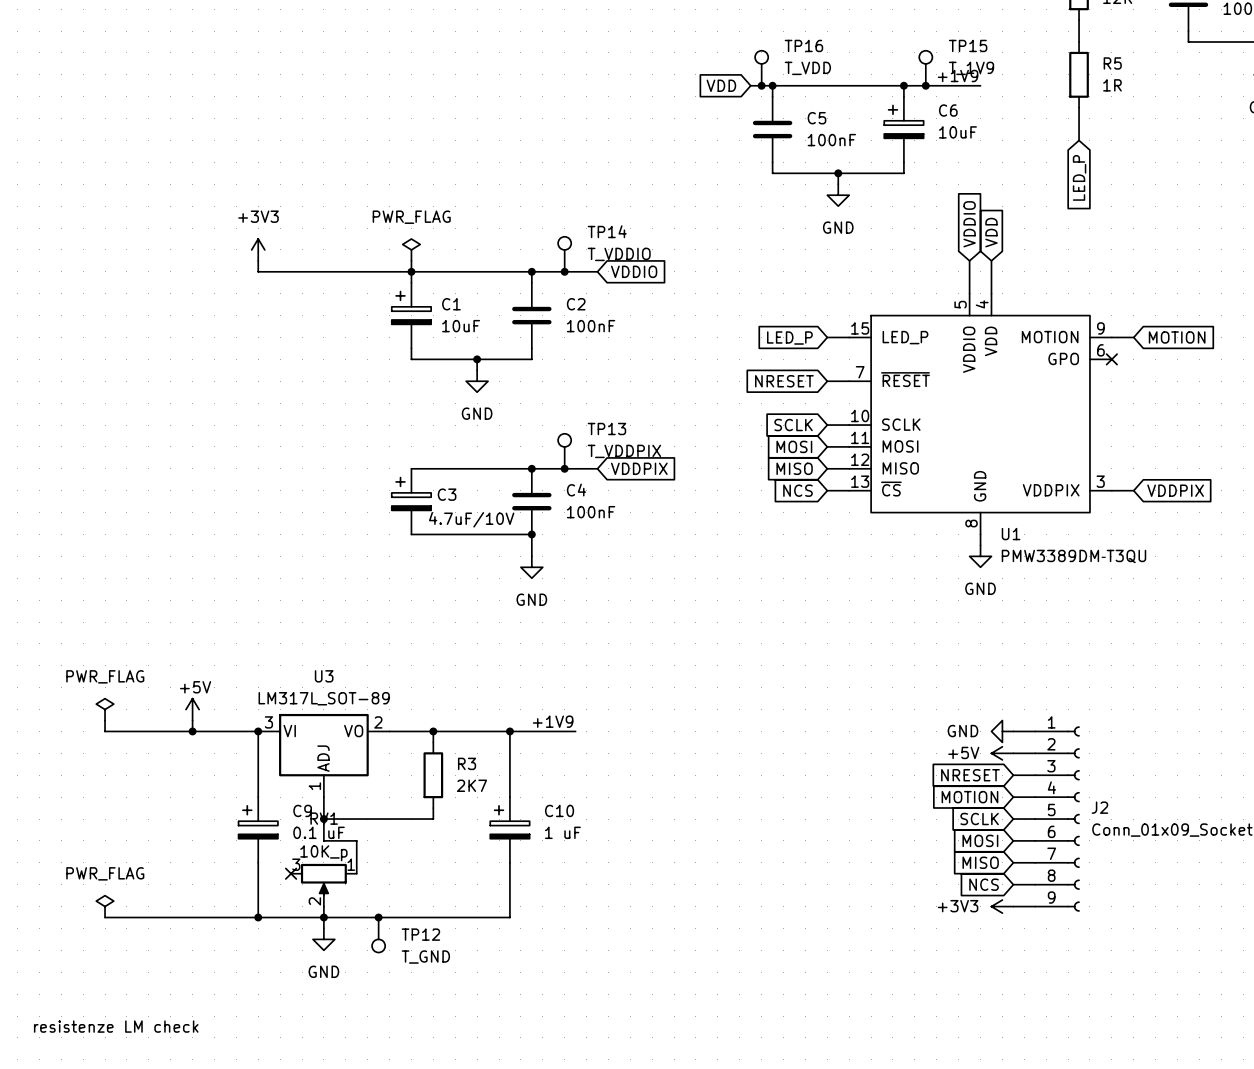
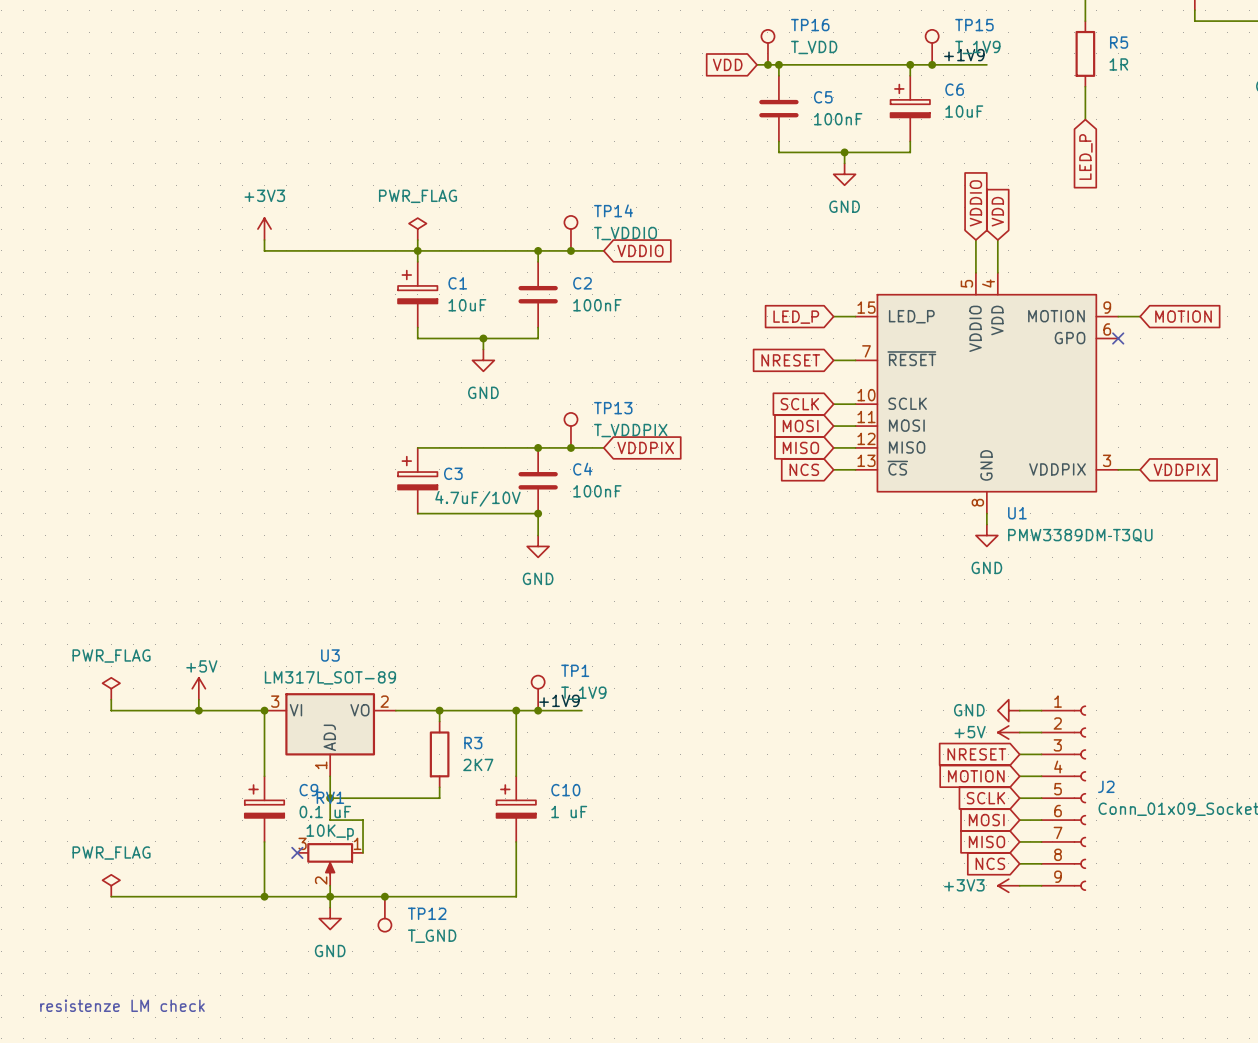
TP1: none -> T_1V9 (538, 693)
junction: none -> (538, 710)

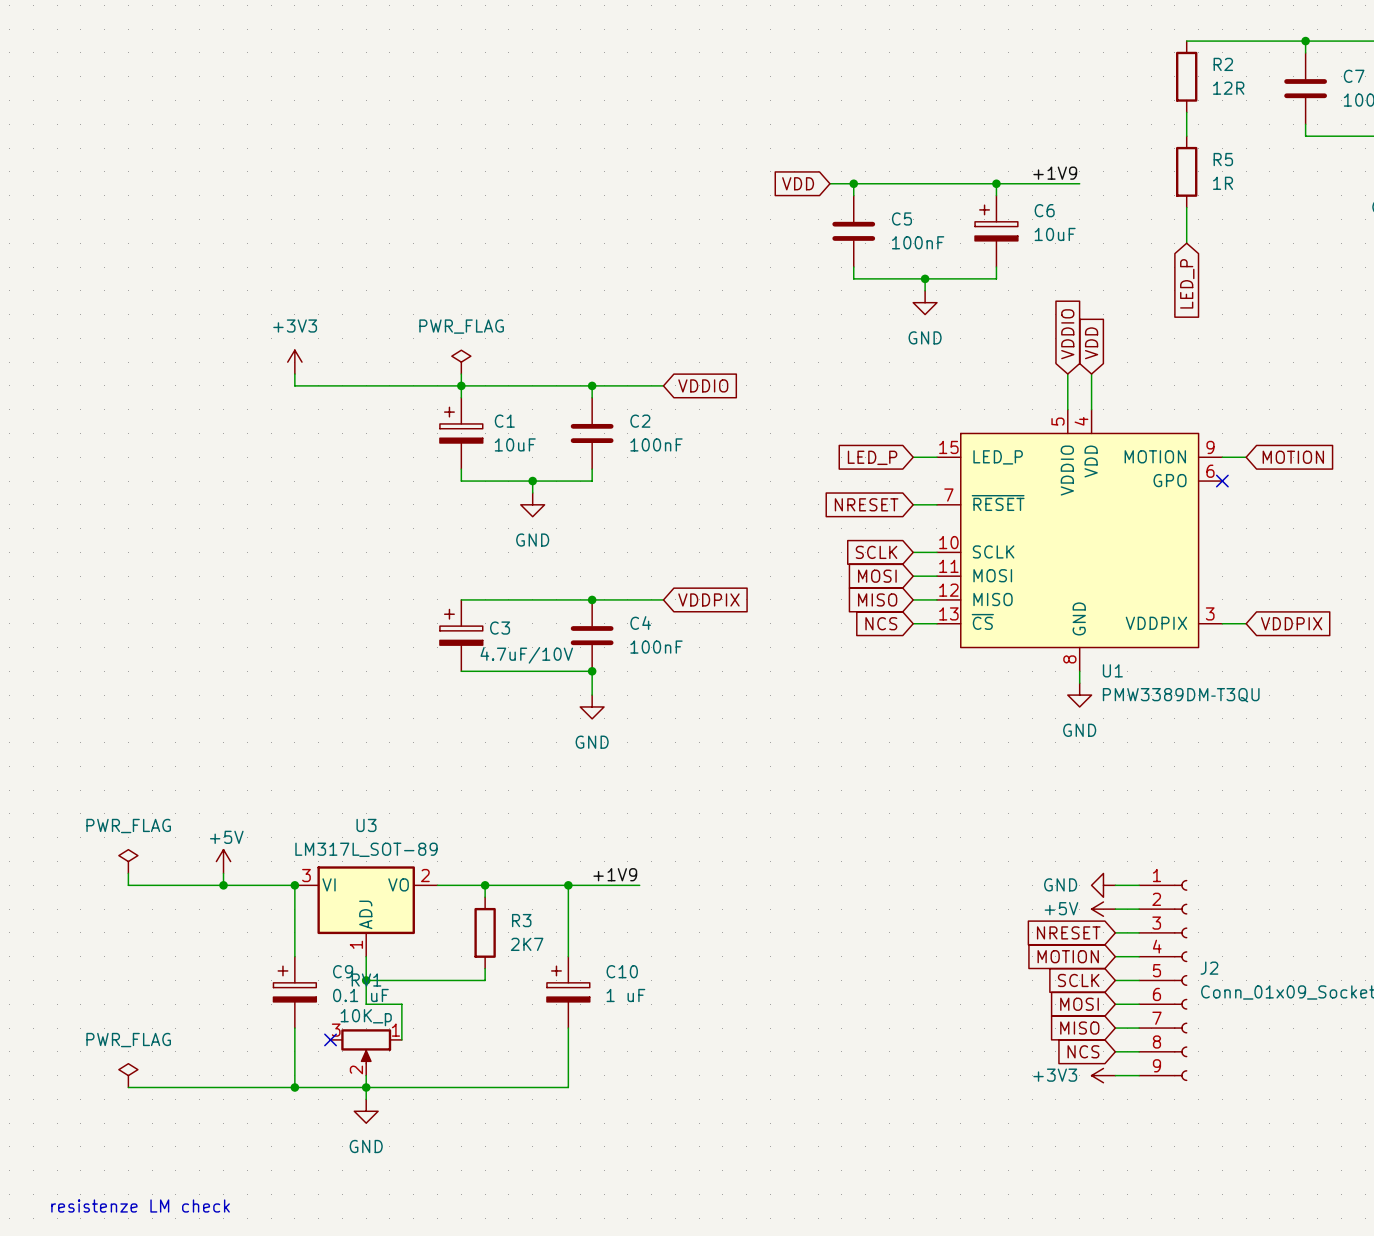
TP16: T_VDD (767, 47) -> none
TP15: T_1V9 (932, 47) -> none
junction: (767, 64) -> none
junction: (932, 64) -> none
TP14: T_VDDIO (570, 233) -> none
junction: (570, 250) -> none
TP13: T_VDDPIX (570, 430) -> none
junction: (570, 447) -> none
TP1: T_1V9 (538, 693) -> none
junction: (538, 710) -> none
junction: (384, 896) -> none
TP12: T_GND (384, 914) -> none

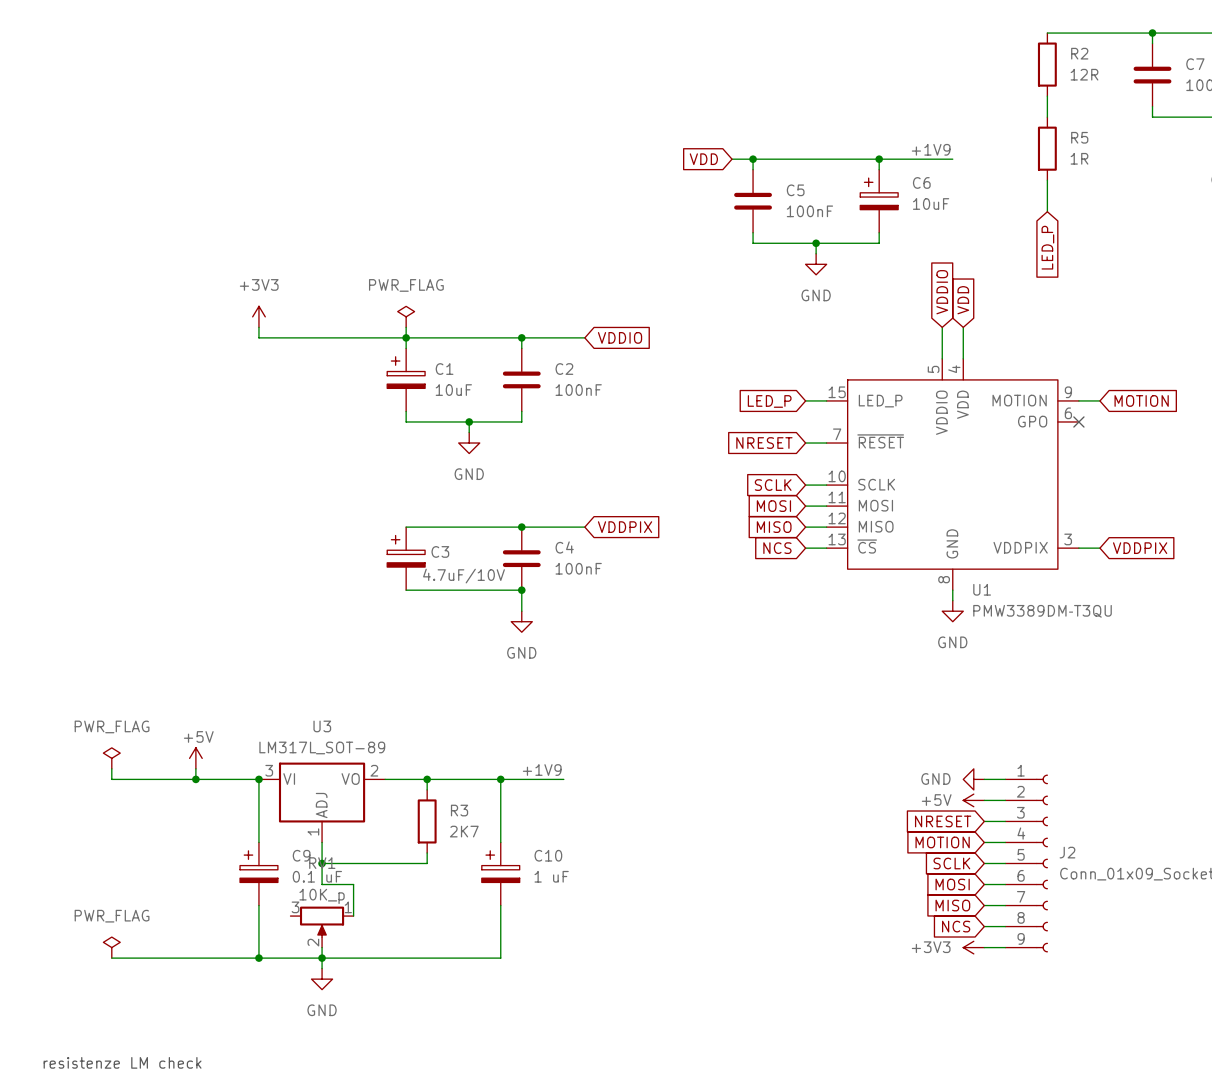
no-connect mark: (330, 1039) -> none

